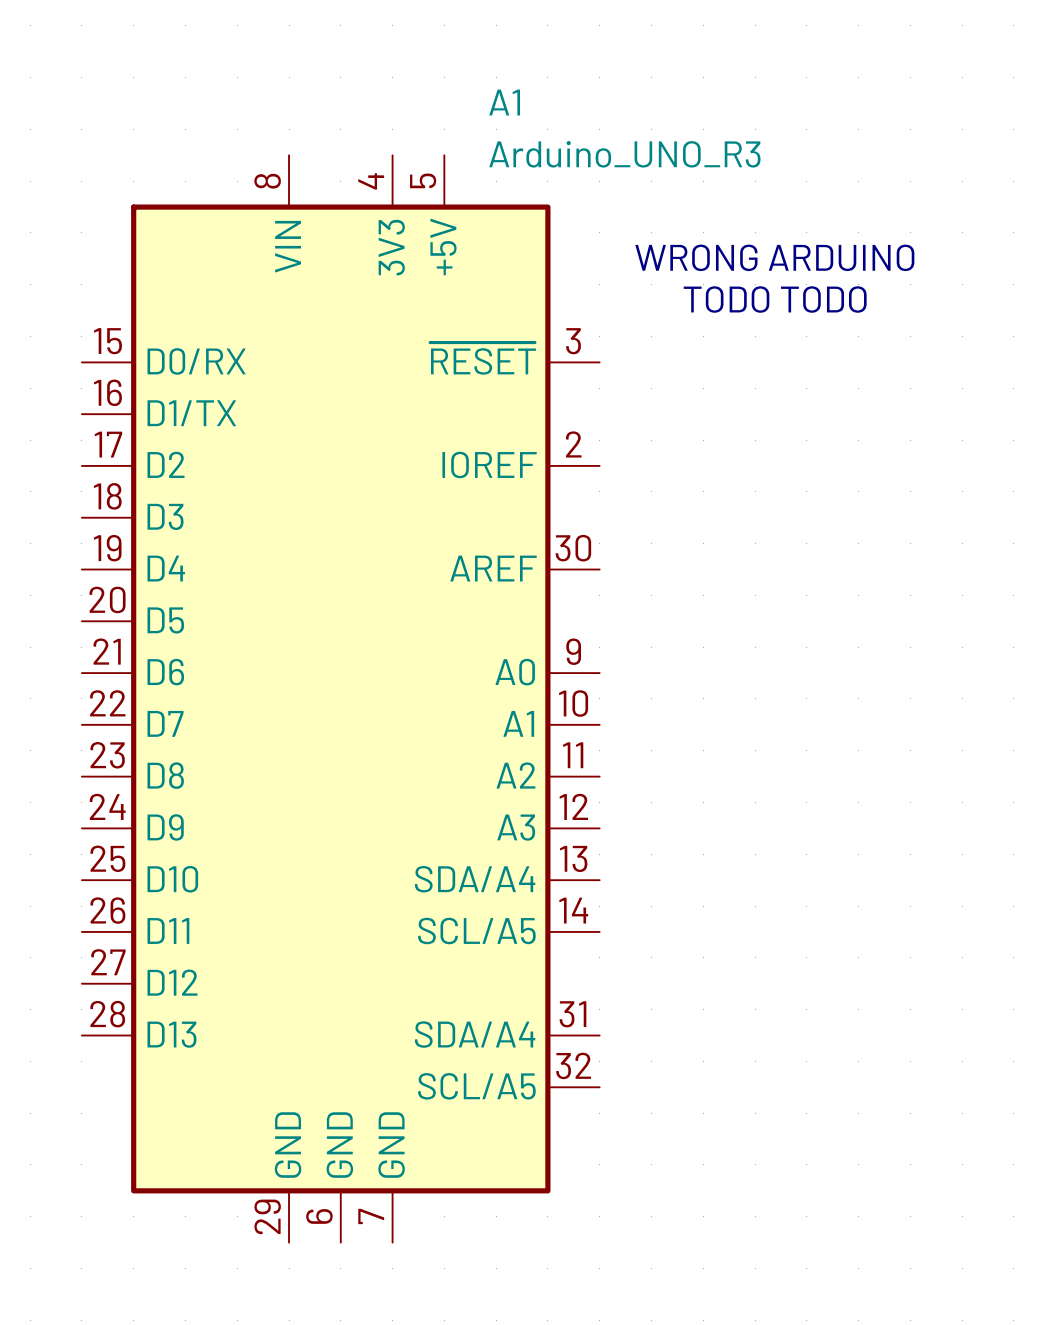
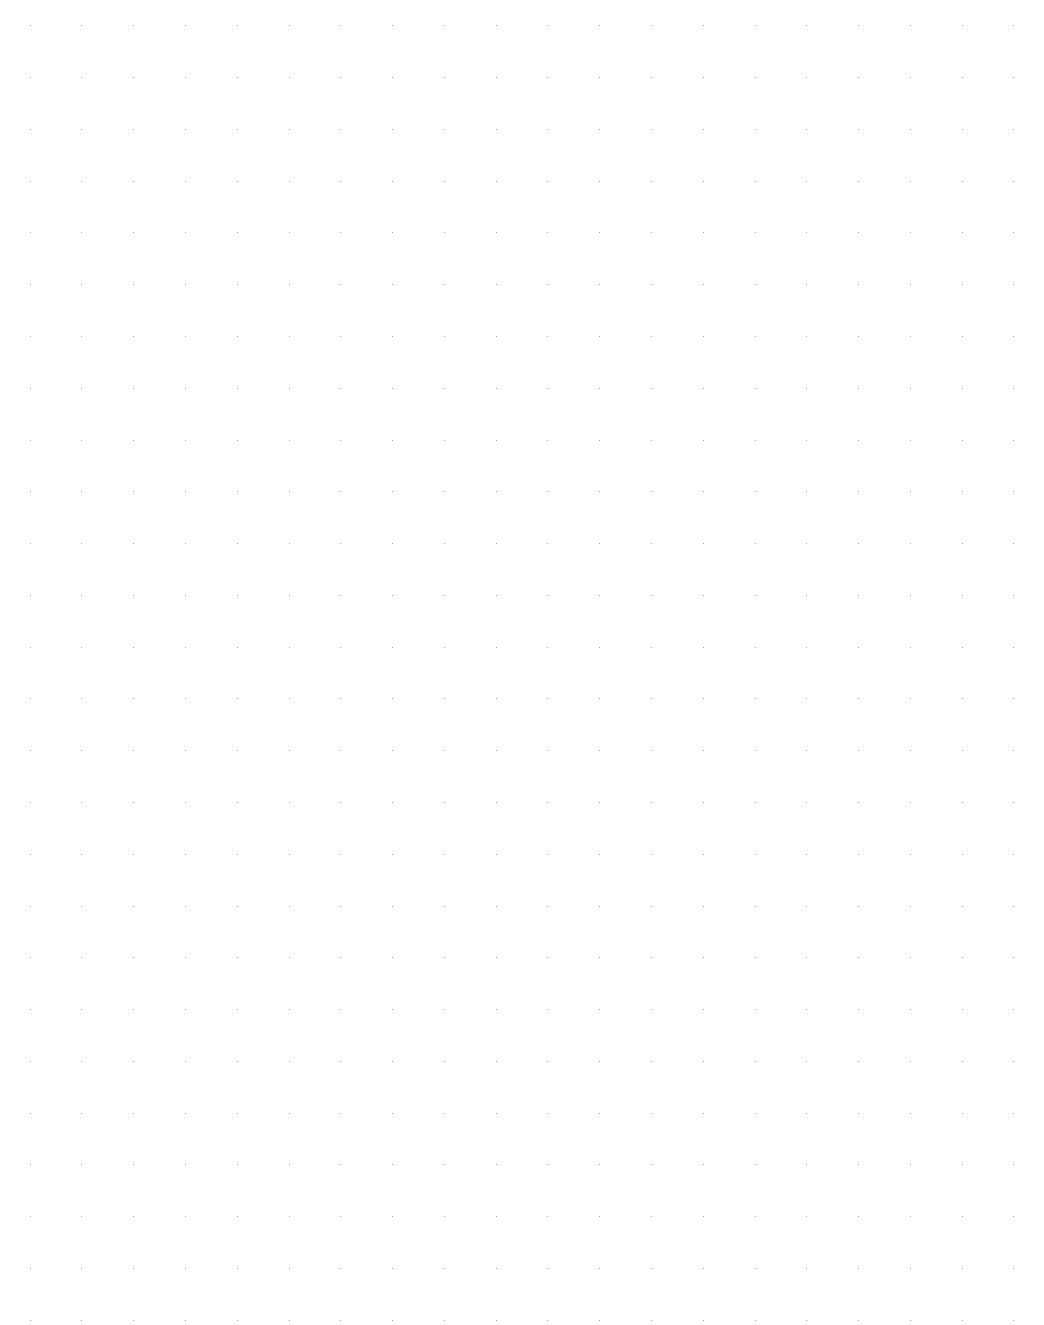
text: WRONG ARDUINO (774, 257) -> none
text: TODO TODO (775, 299) -> none
A1: Arduino_UNO_R3 (340, 698) -> none

